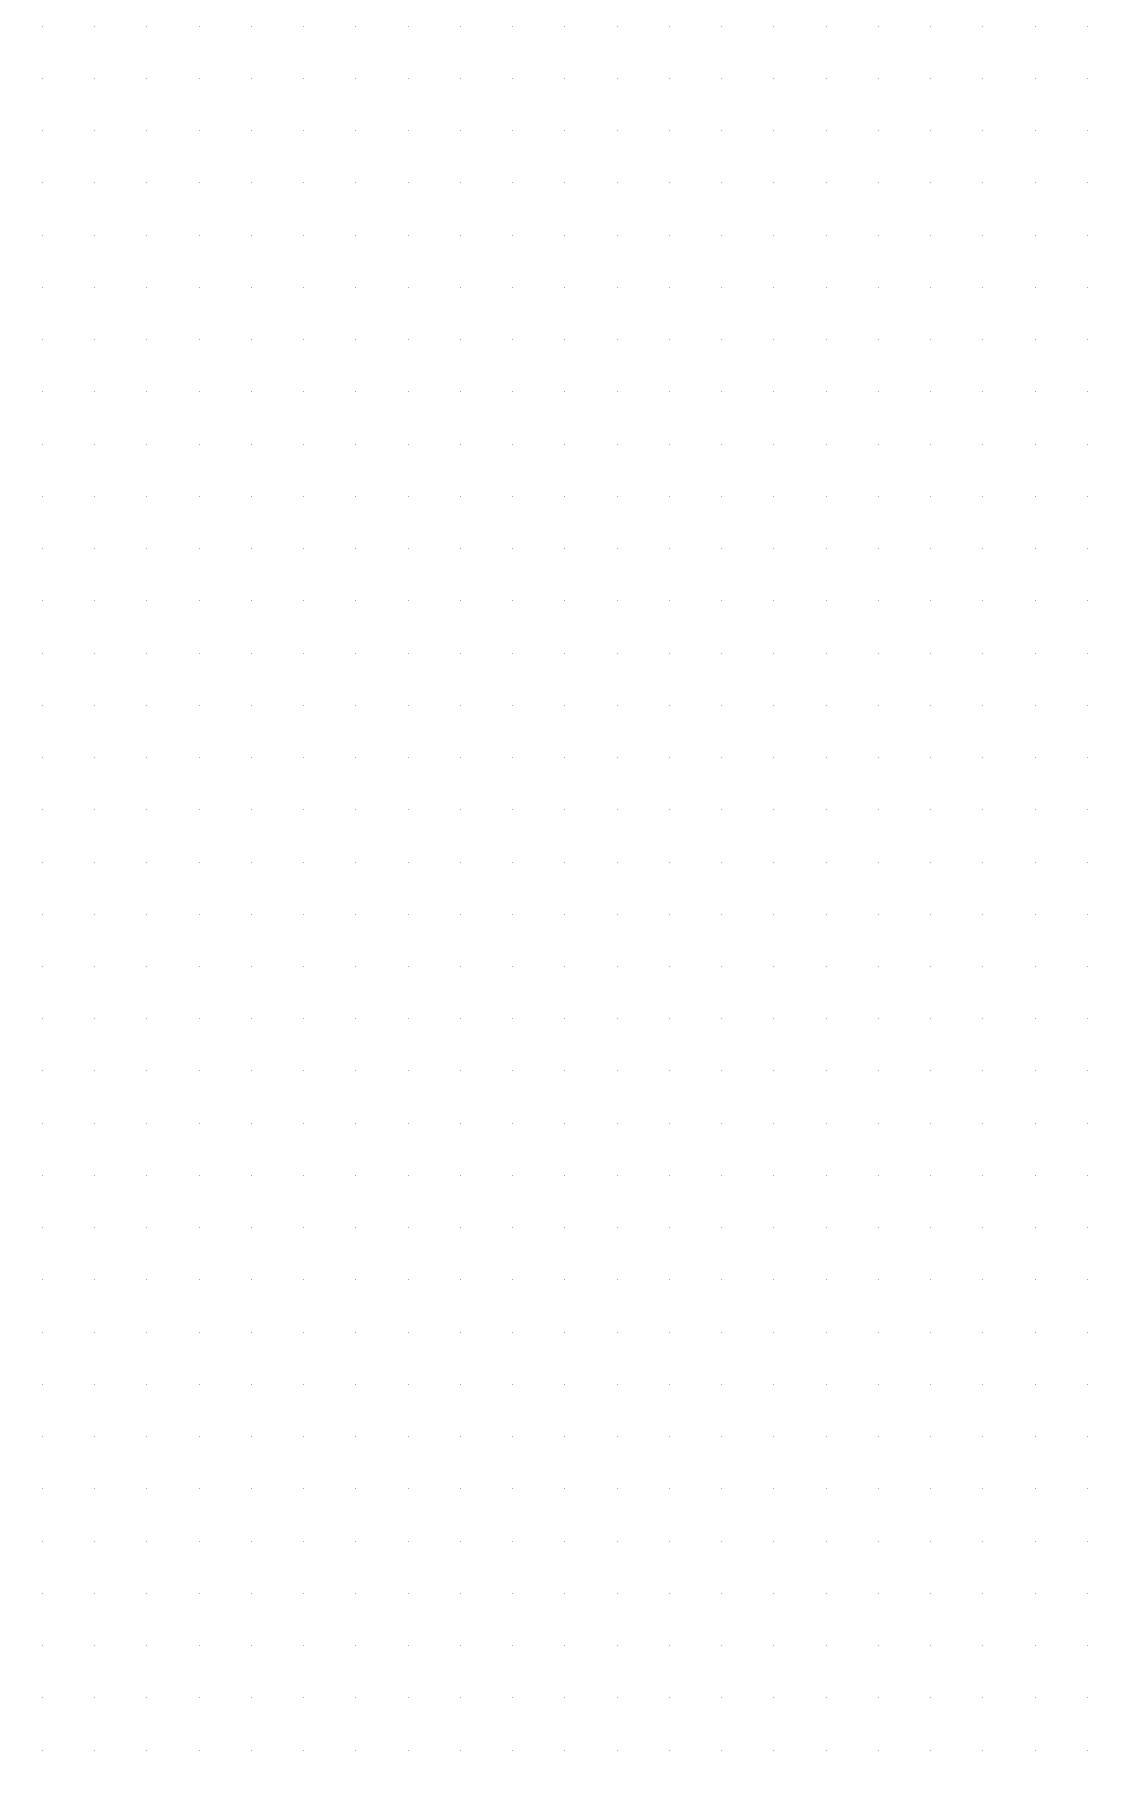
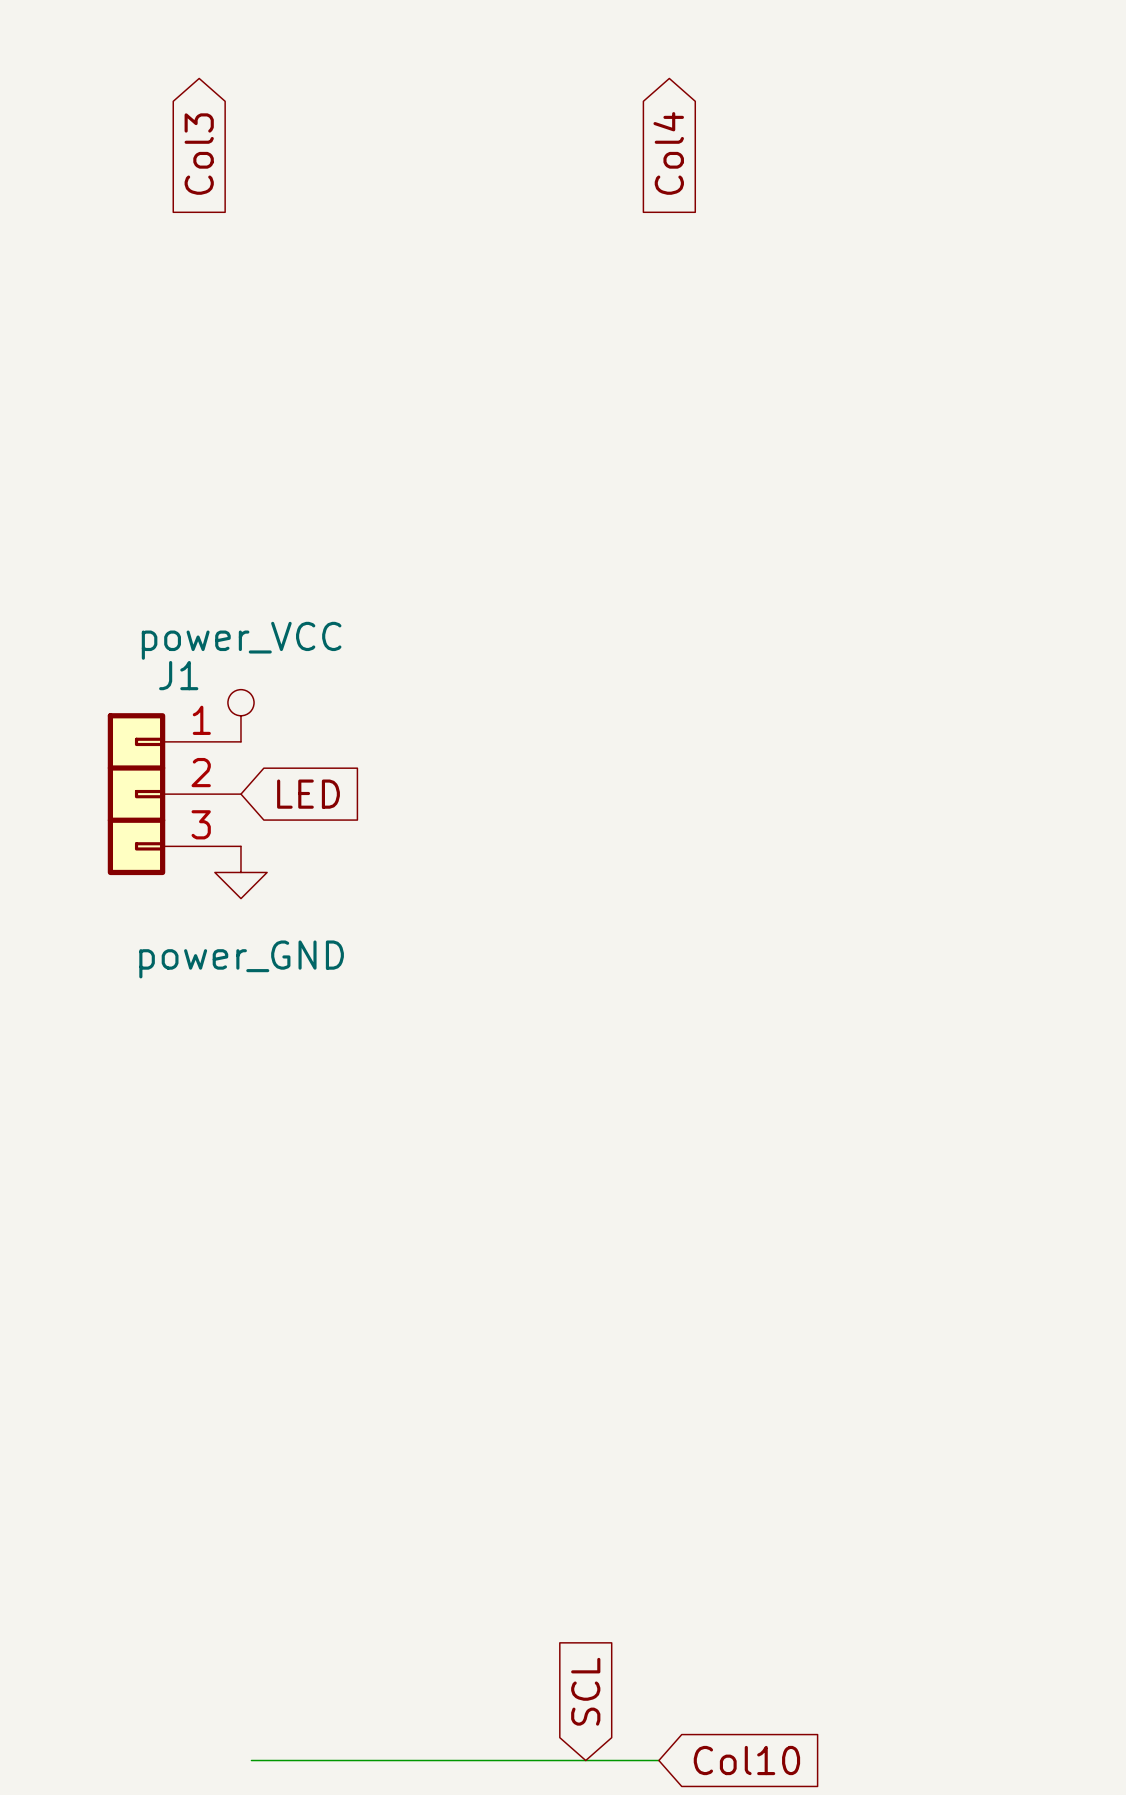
global label: none -> Col3 (199, 154)
global label: none -> Col4 (668, 153)
power symbol: none -> power_VCC (240, 715)
J1: none -> (174, 794)
global label: none -> LED (308, 794)
power symbol: none -> power_GND (240, 872)
global label: none -> SCL (585, 1691)
global label: none -> Col10 (746, 1760)
wire: none -> (251, 1760) (658, 1760)

